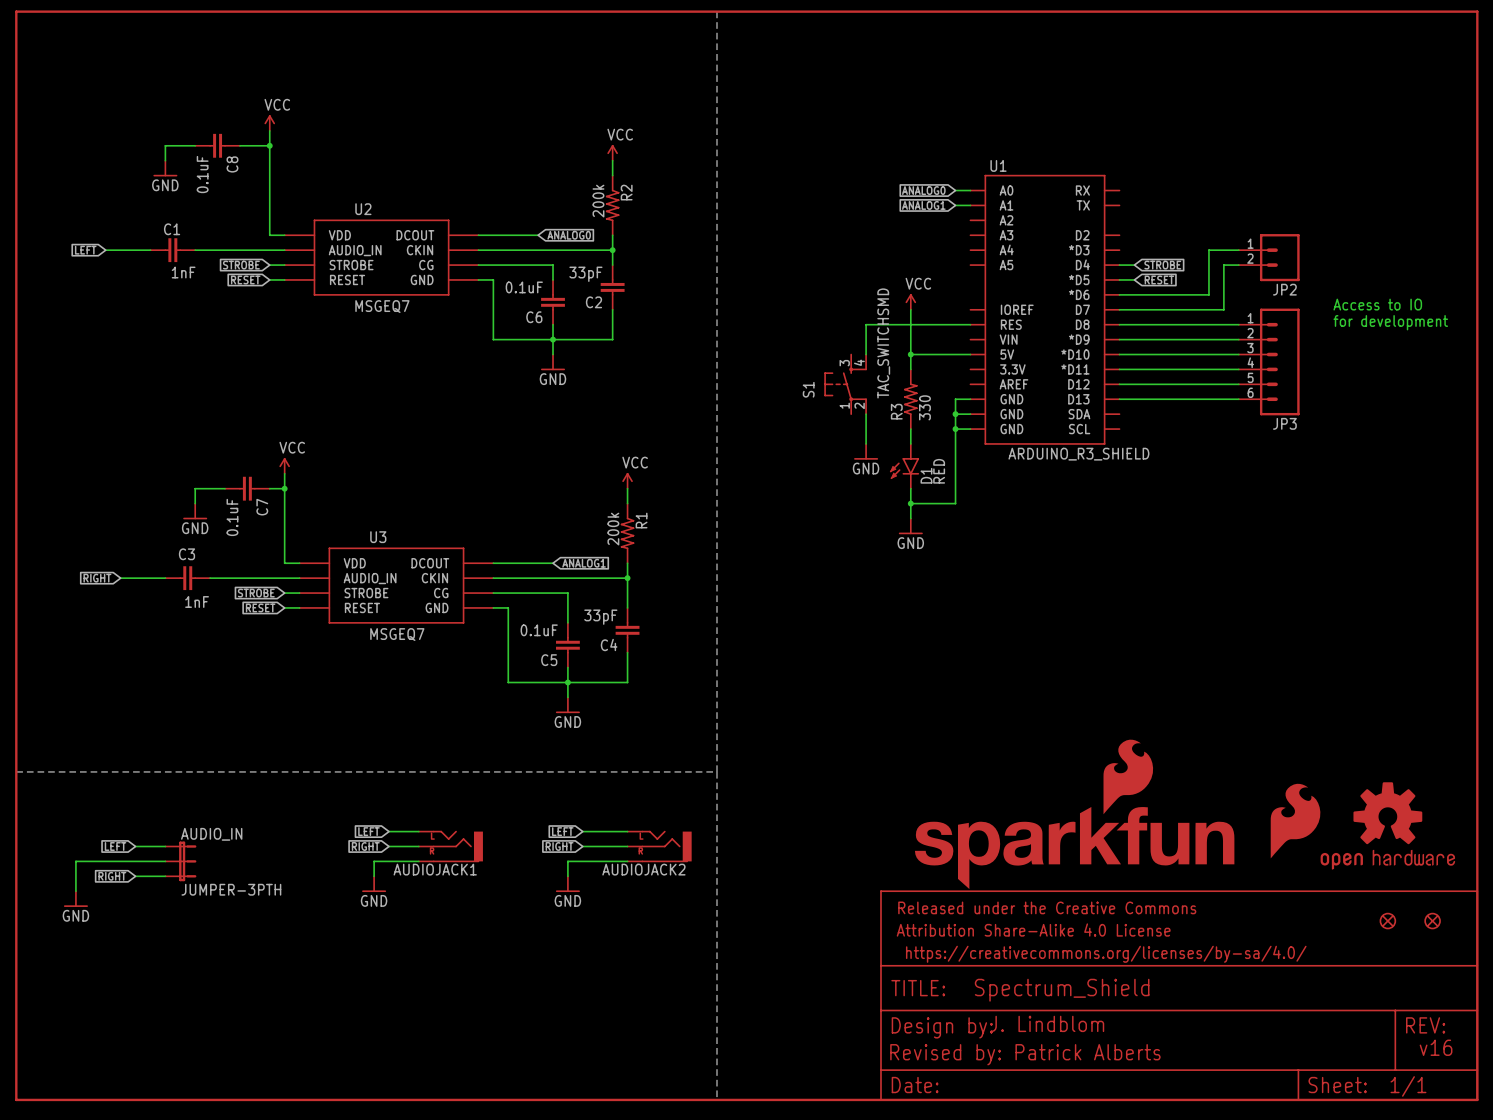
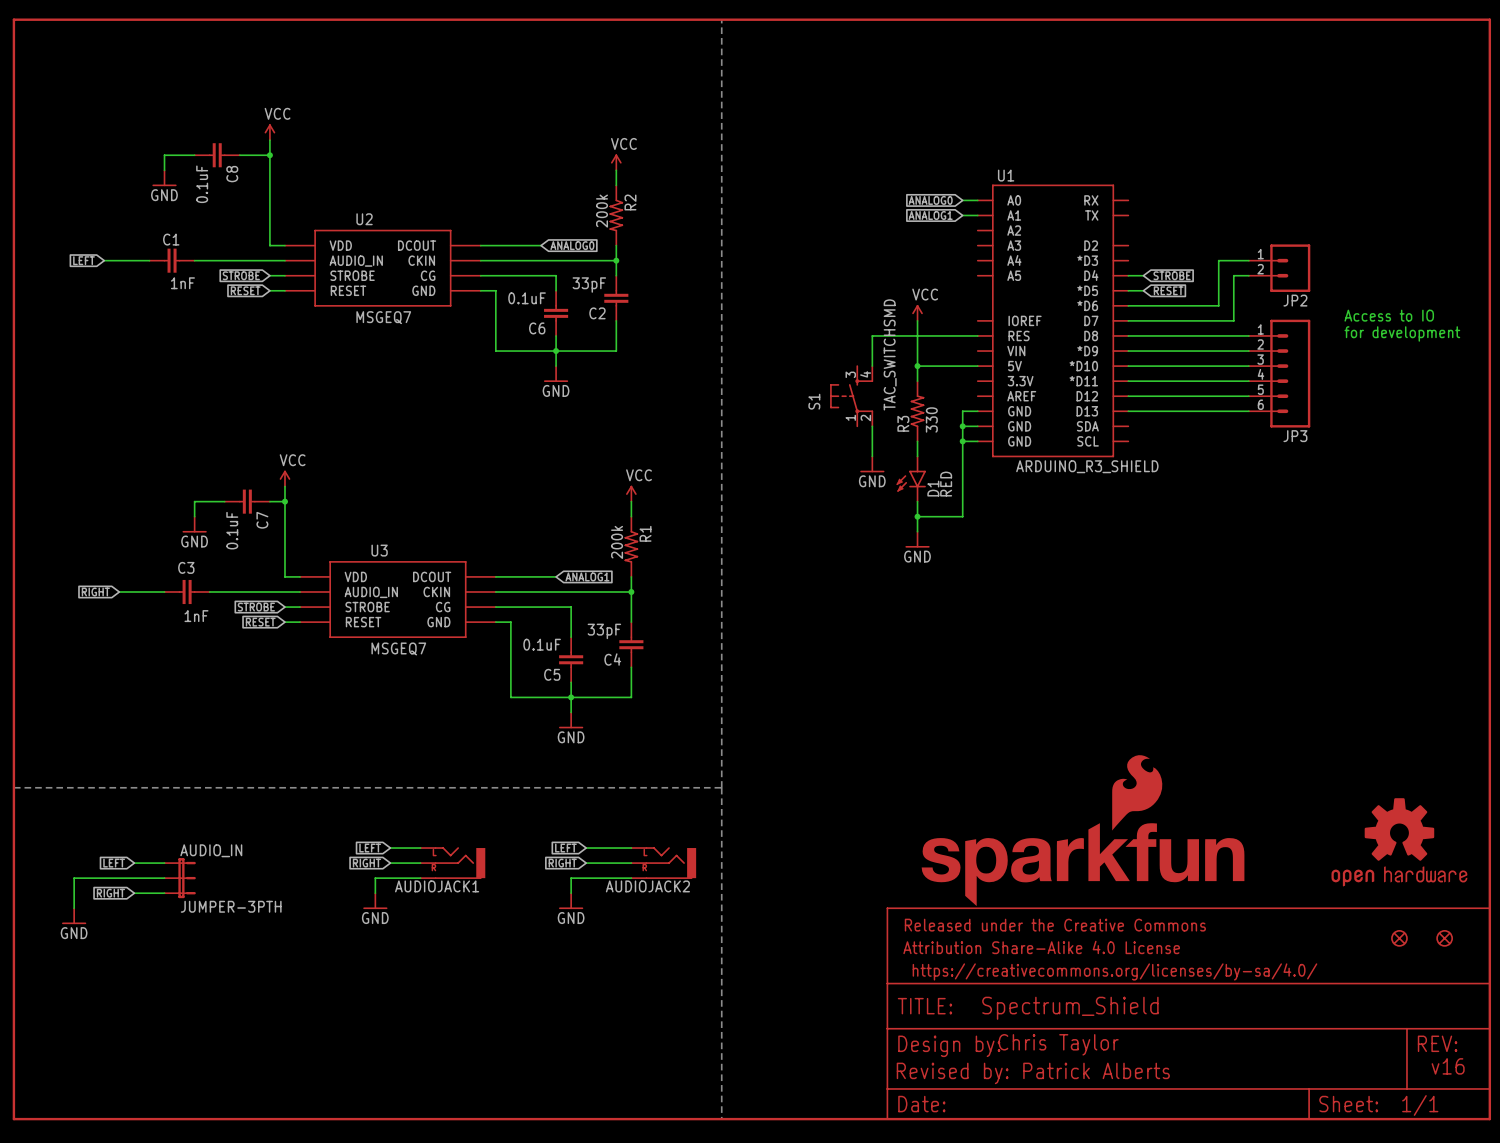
part: (1295, 821) -> none
text: J. Lindblom (1047, 1023) -> Chris Taylor (1058, 1044)

